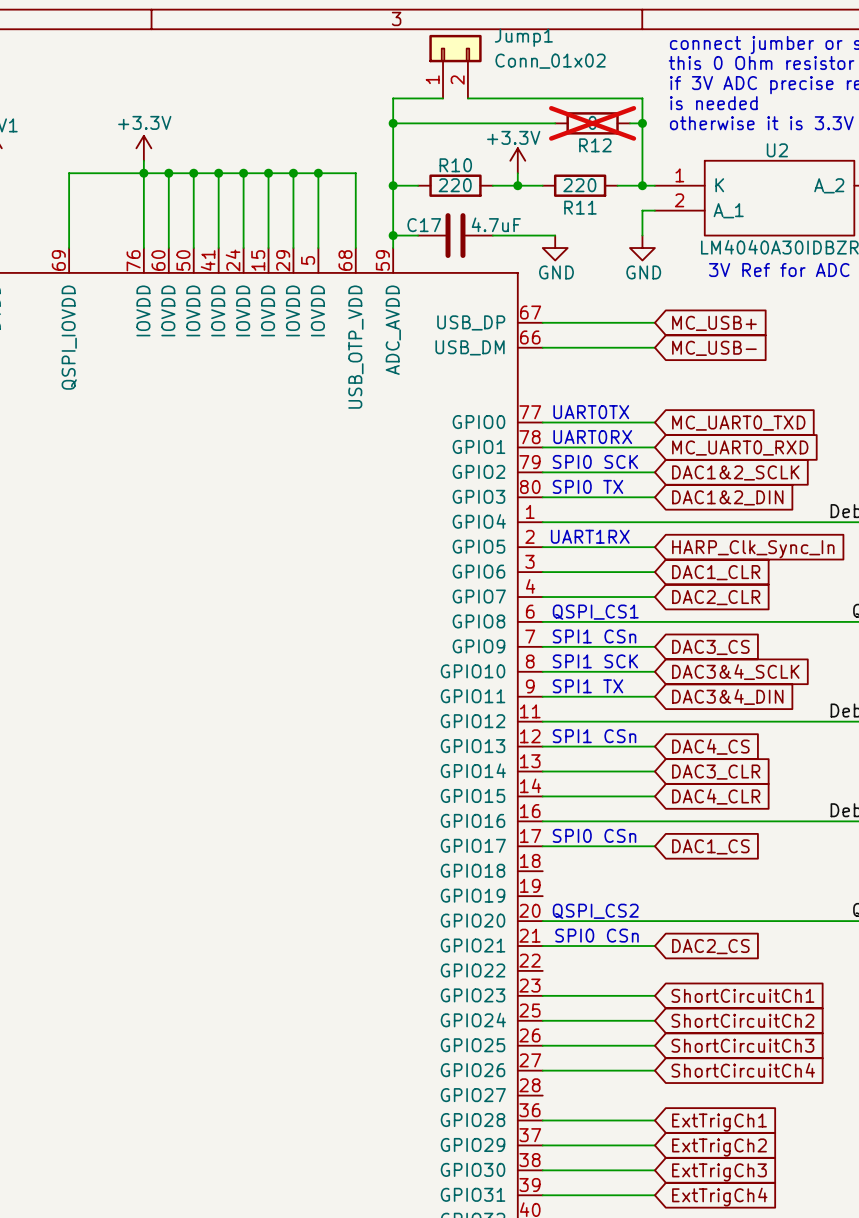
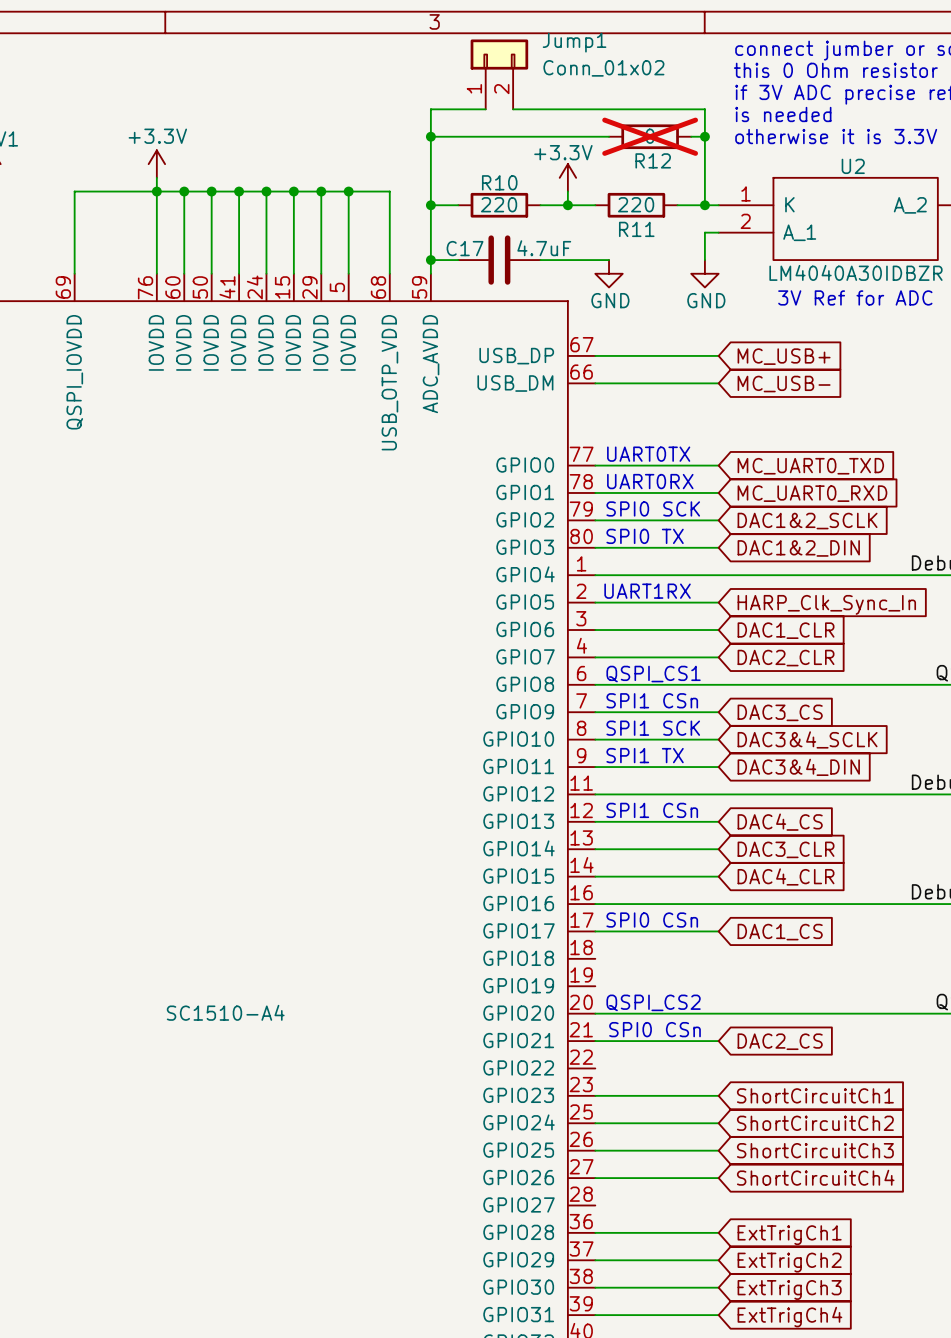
part text: none -> SC1510-A4 (225, 1012)

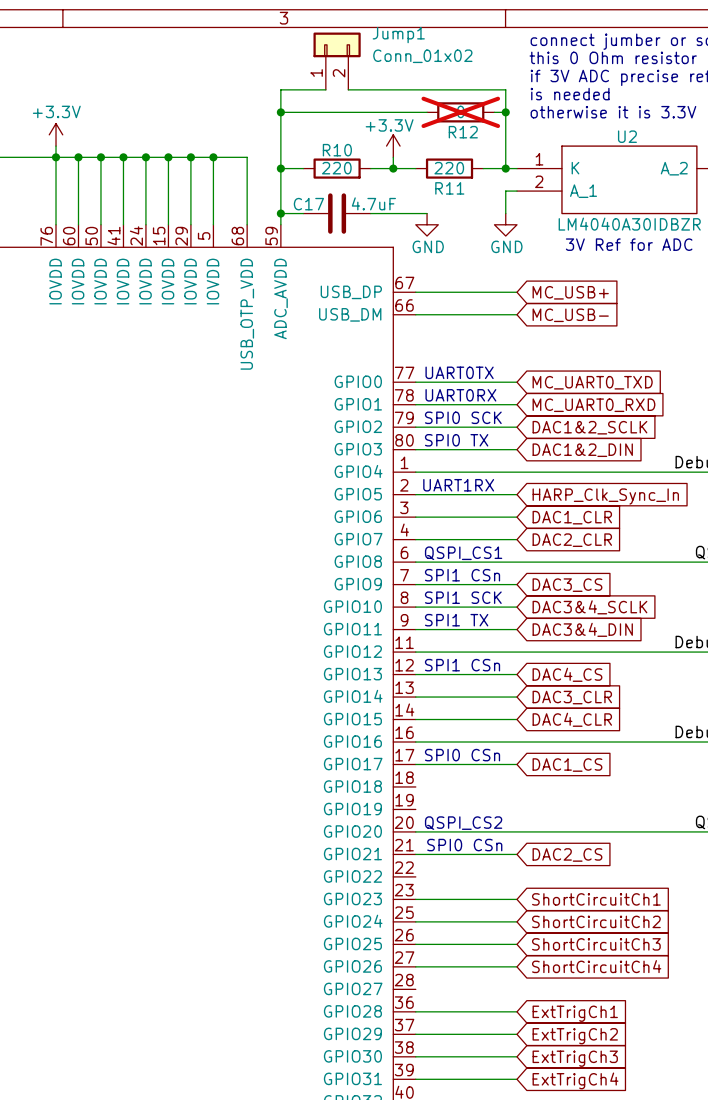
part text: SC1510-A4 (225, 1012) -> none

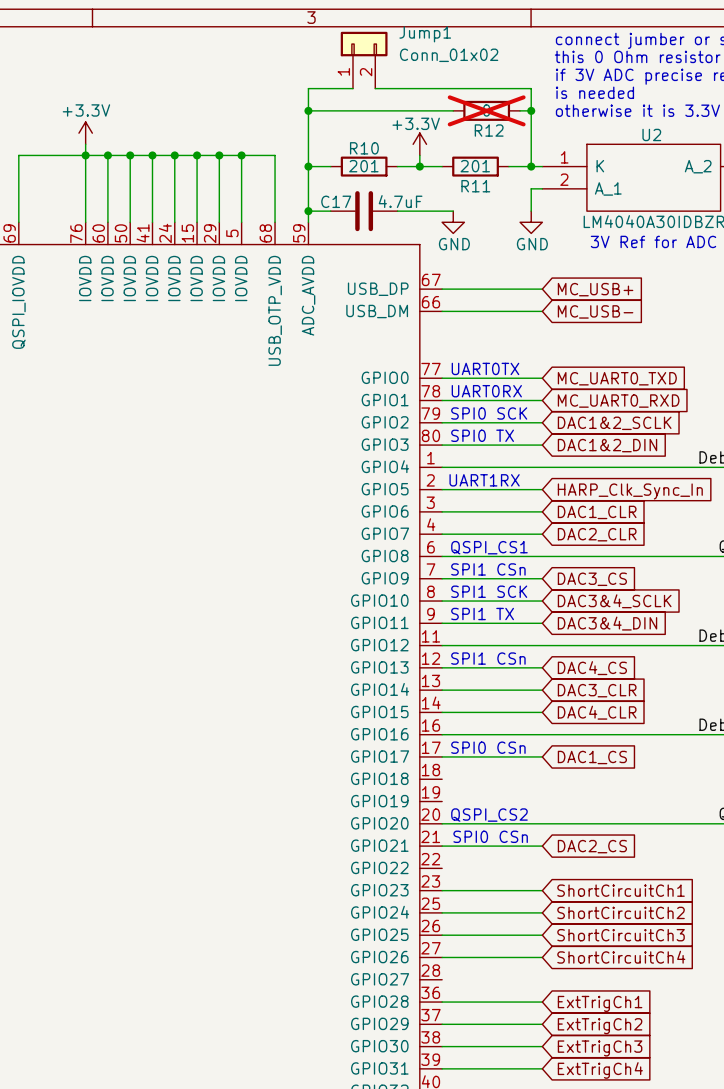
R10 value: 220 (336, 168) -> 201 (363, 166)
R11 value: 220 (449, 168) -> 201 (475, 166)

